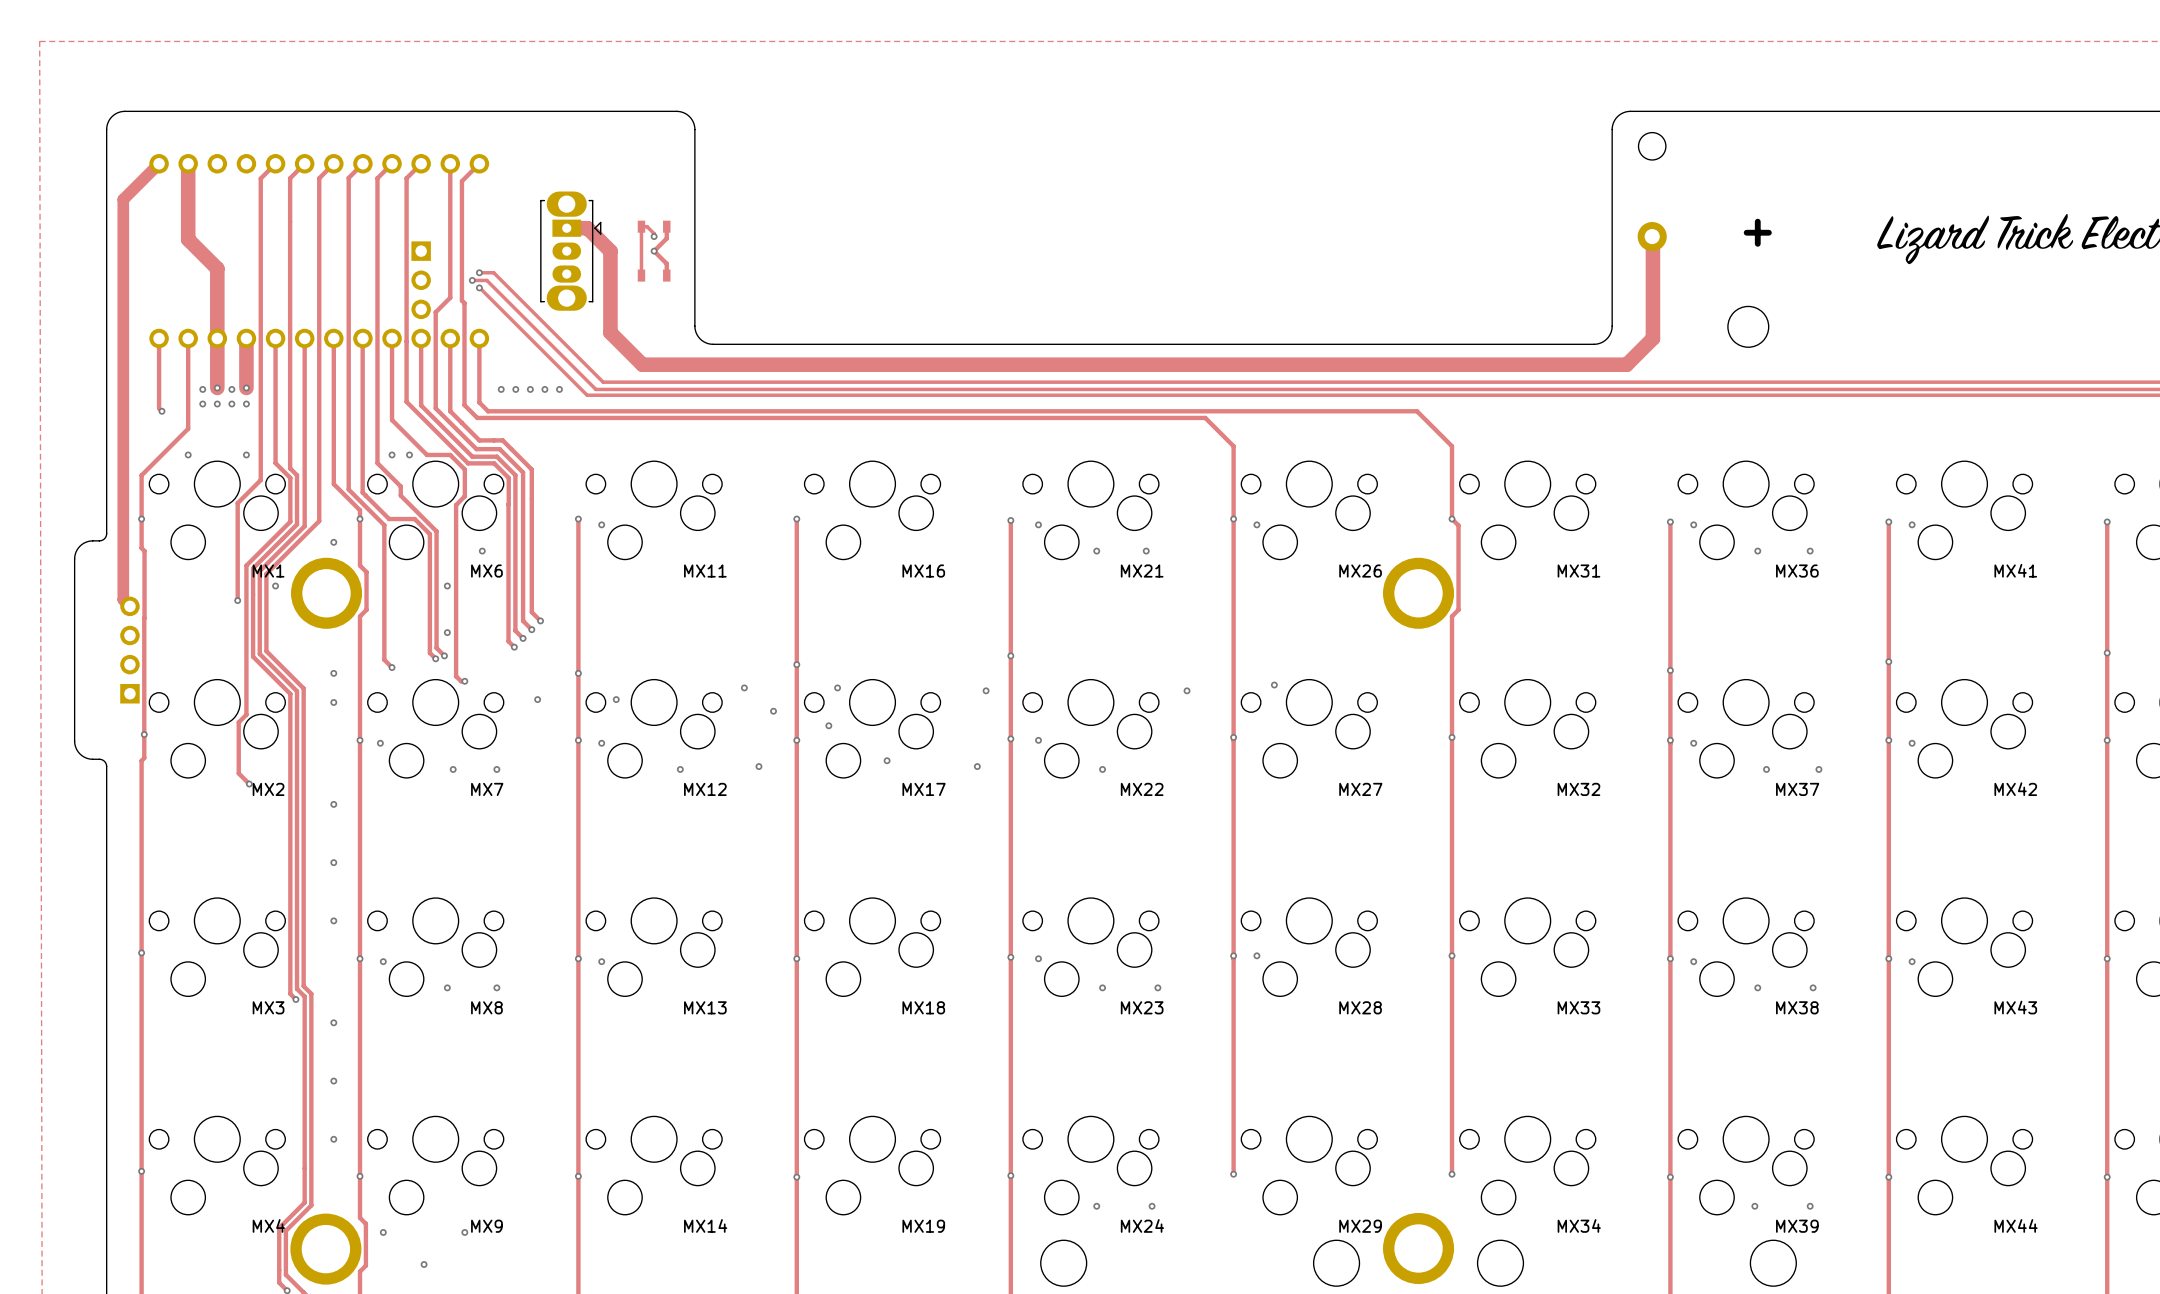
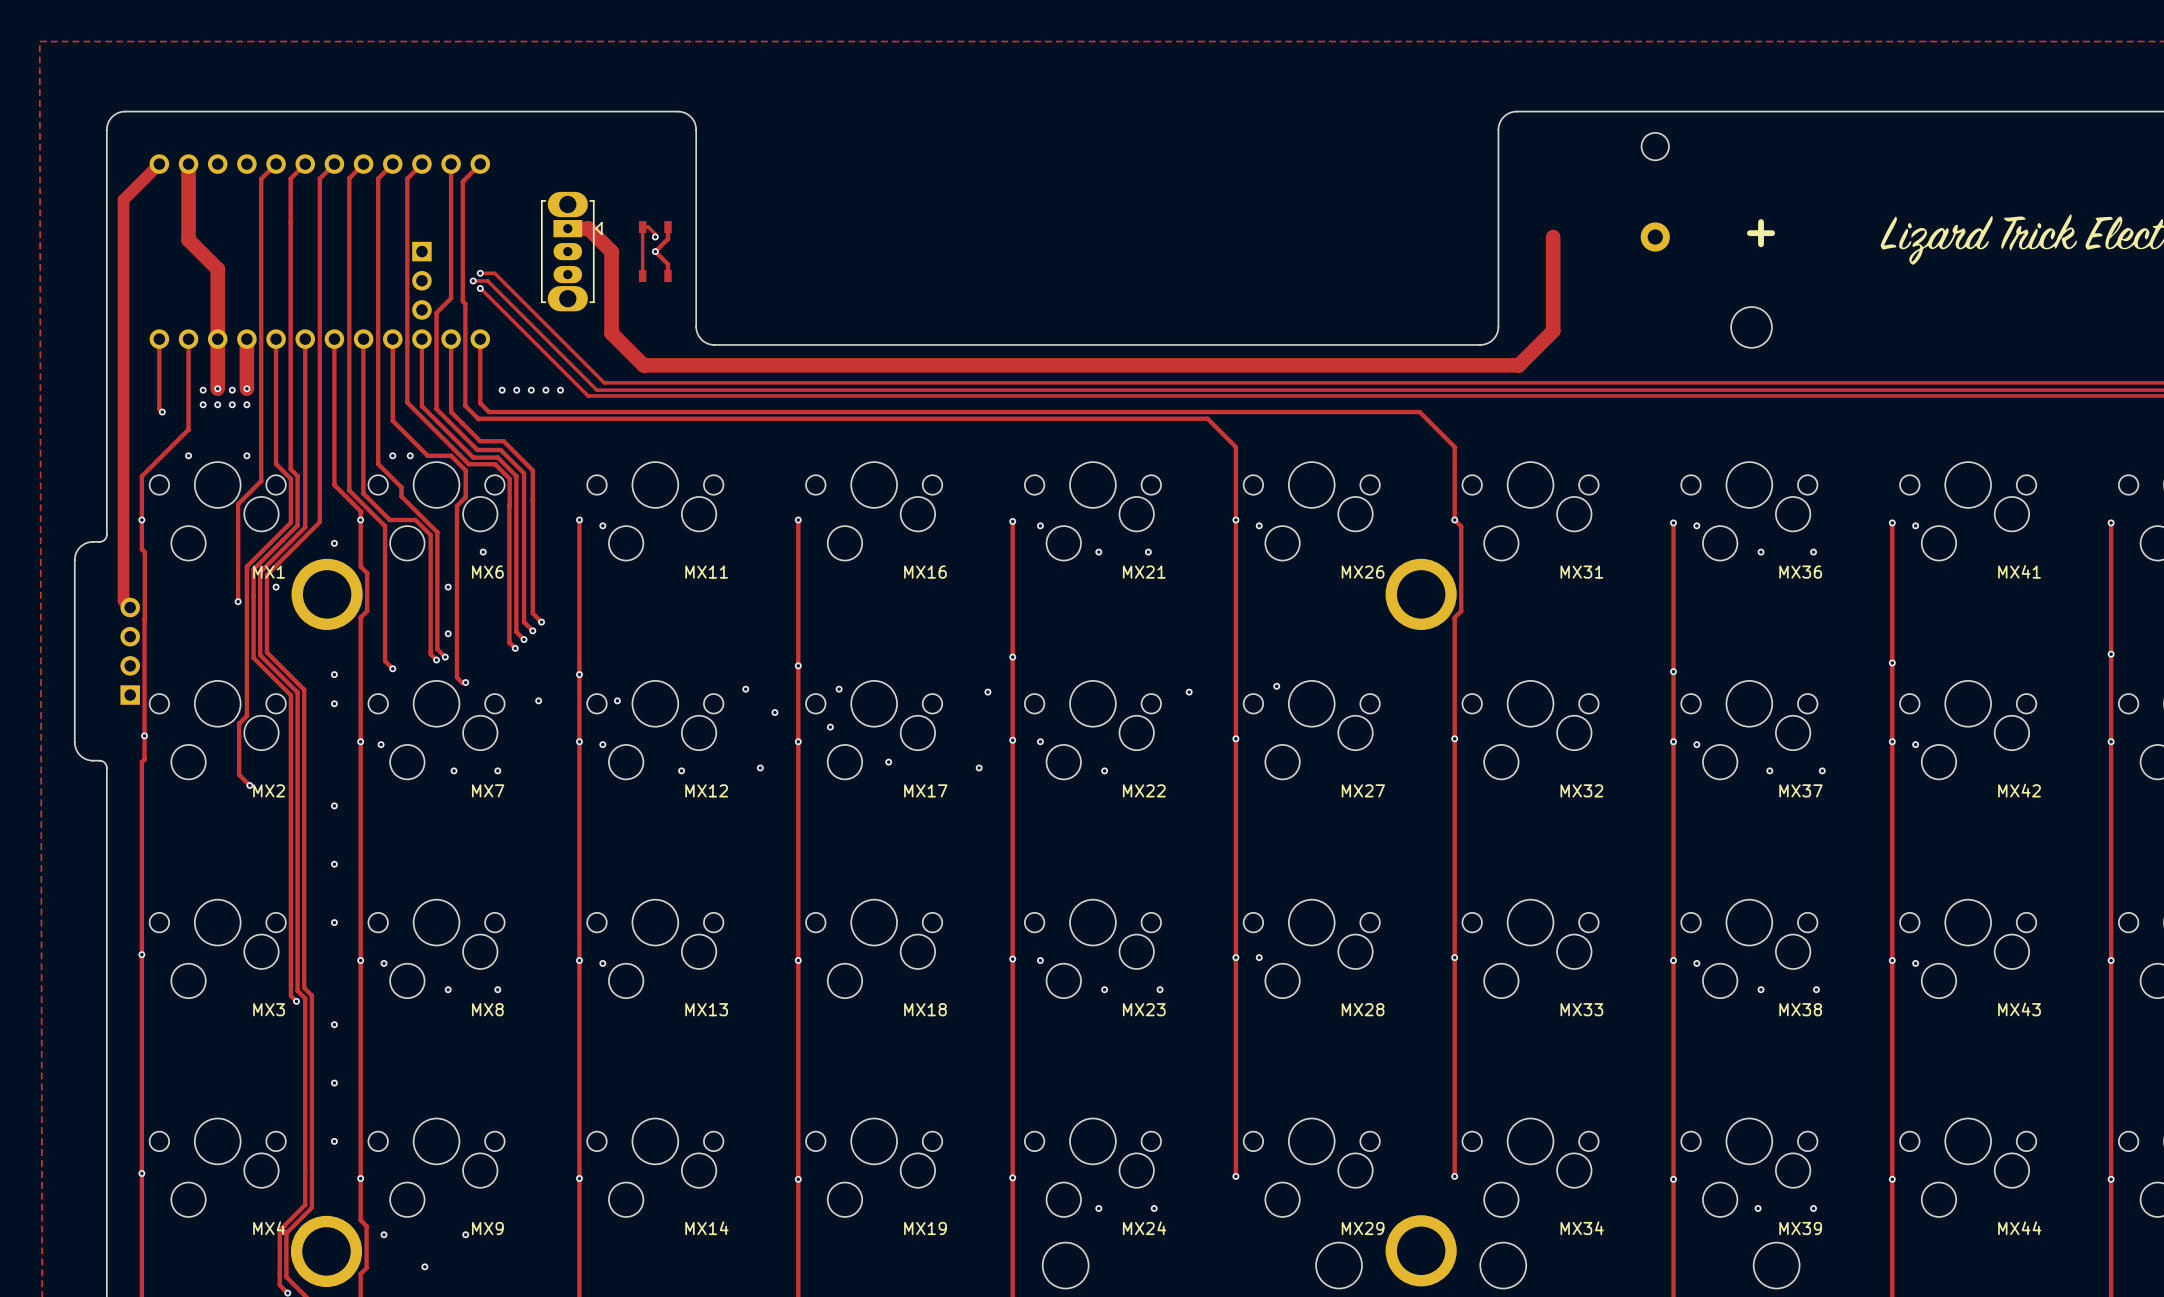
board edge: (1630, 111) (1617, 116) (1612, 127) (1612, 326) (1609, 335) (1603, 341) (1596, 344) (1477, 344) -> (1633, 111) (1514, 111) (1505, 115) (1500, 120) (1498, 129) (1498, 329) (1491, 341) (1480, 344)
track: (1652, 236) (1652, 338) (1626, 364) (1516, 364) -> (1553, 237) (1553, 331) (1518, 365)

